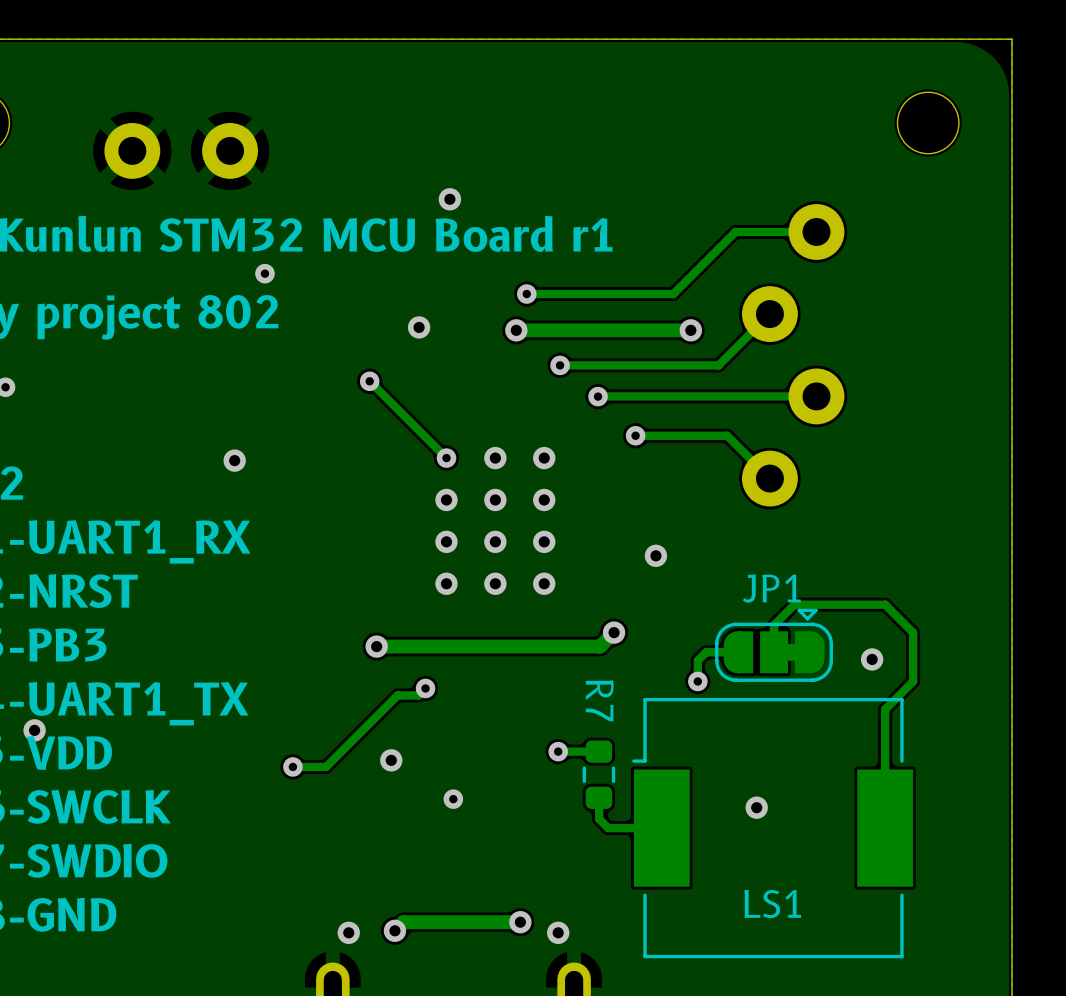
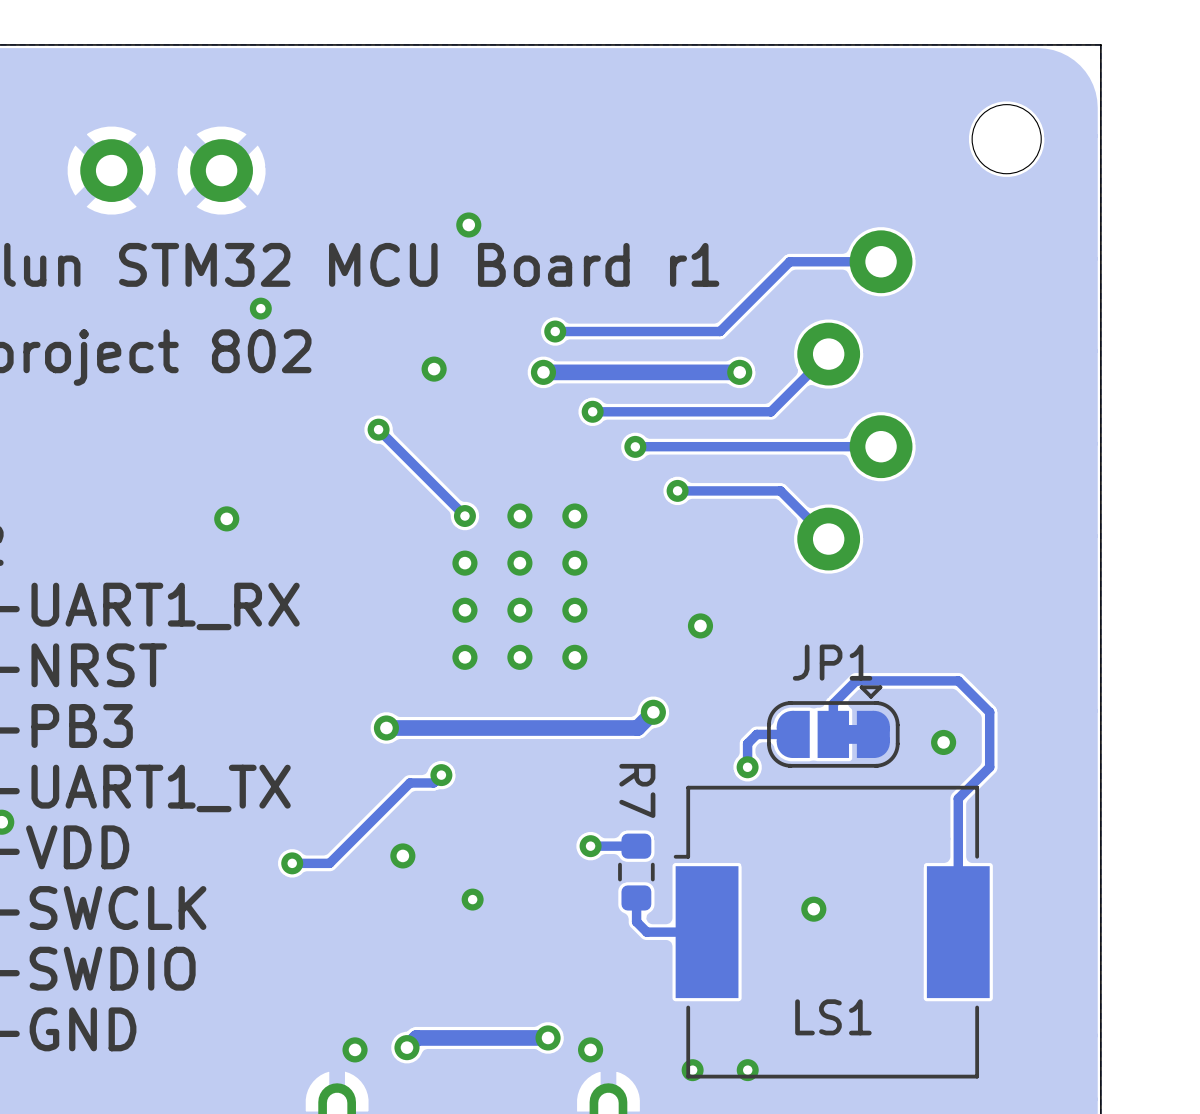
via: none -> (692, 1070)
via: none -> (747, 1070)

